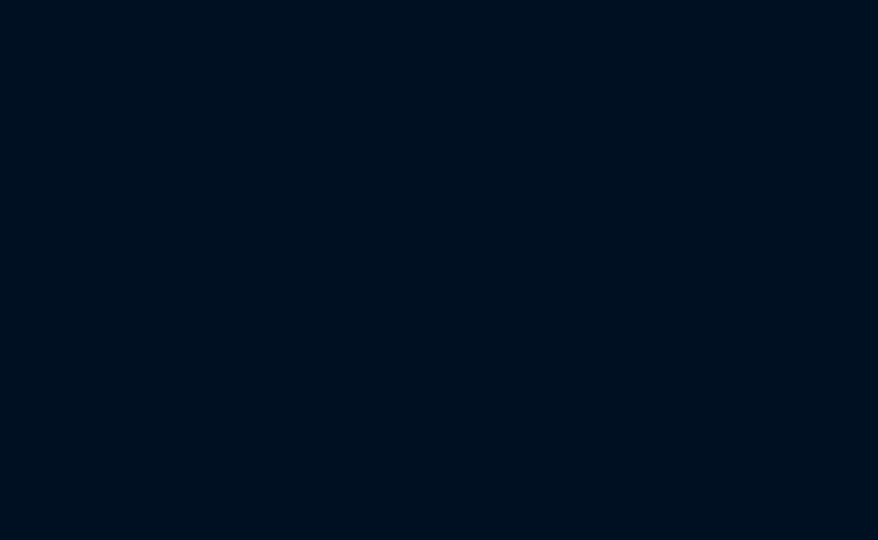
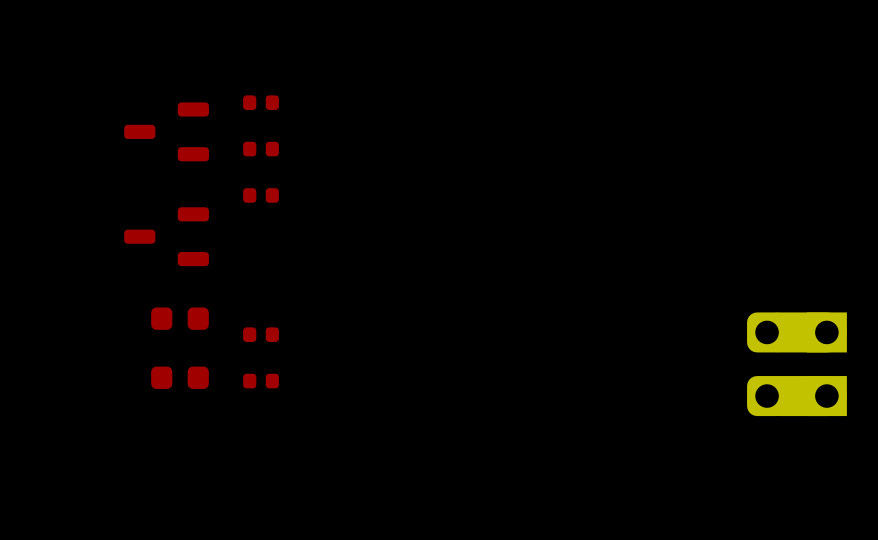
part: none -> (261, 102)
part: none -> (166, 131)
part: none -> (261, 149)
part: none -> (261, 195)
part: none -> (166, 236)
part: none -> (180, 318)
part: none -> (796, 332)
part: none -> (261, 334)
part: none -> (180, 377)
part: none -> (261, 381)
part: none -> (796, 396)

